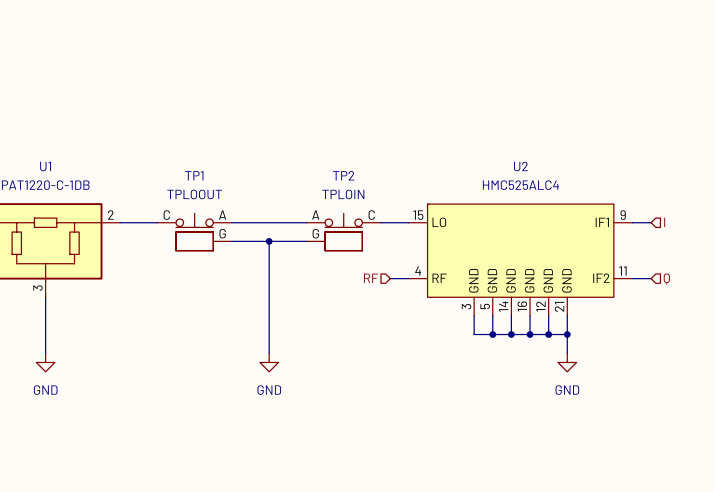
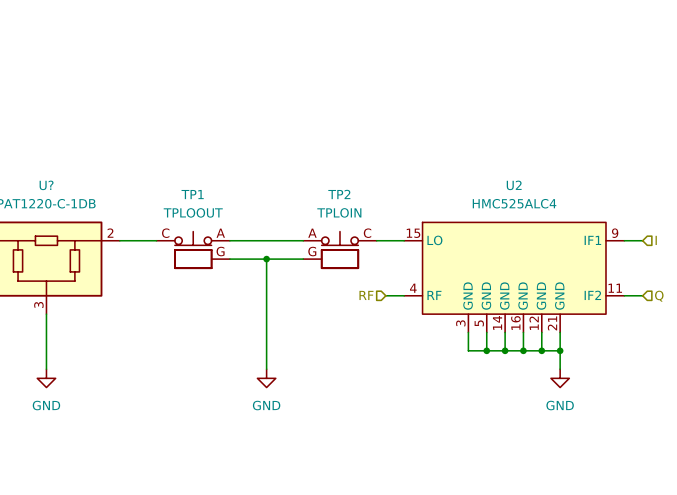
U1 name: U1 (45, 166) -> U? (46, 185)

